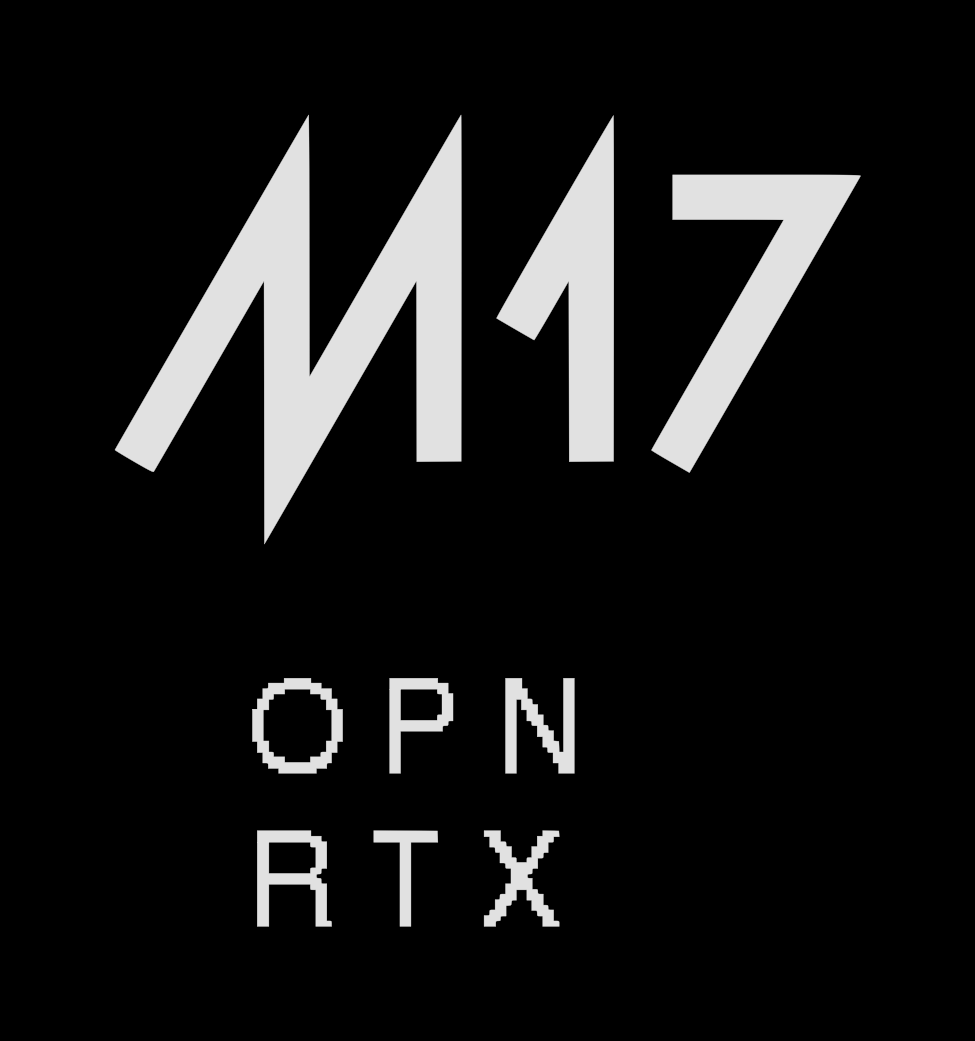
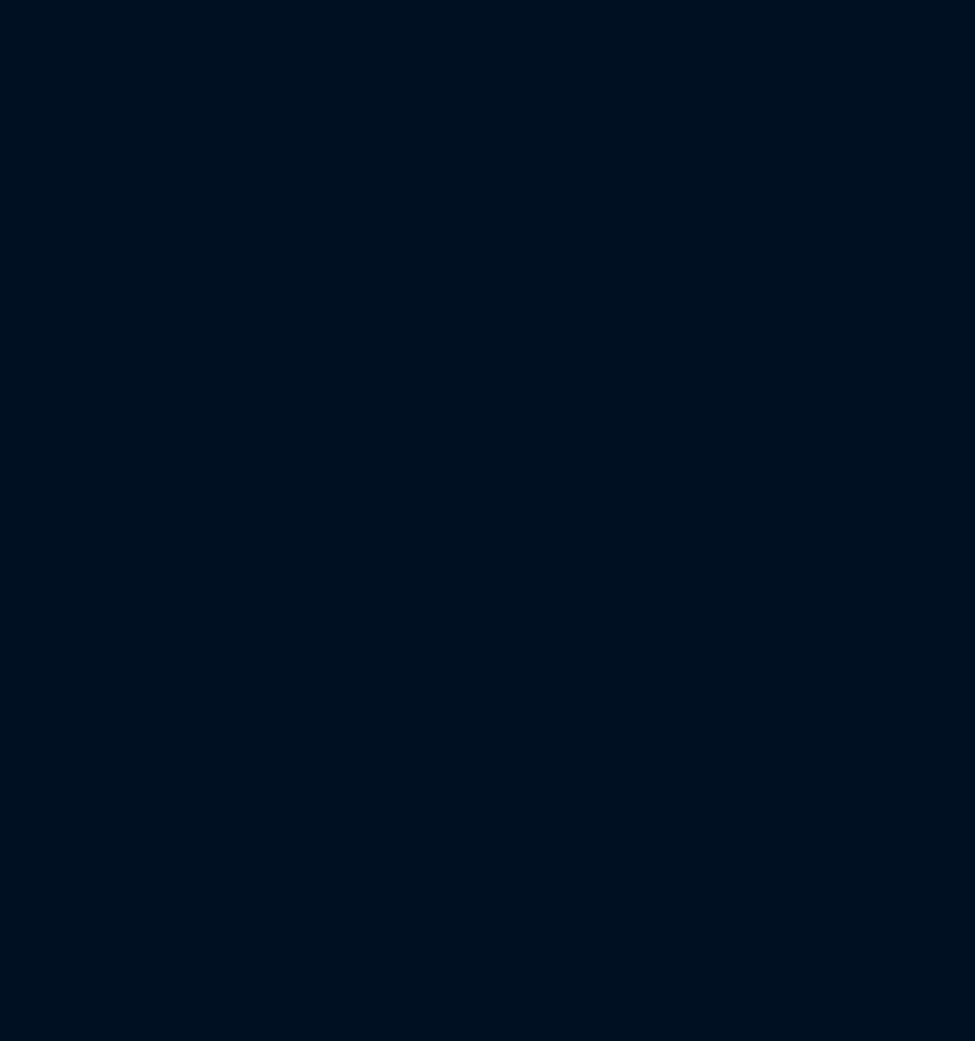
drawing: [114, 114, 861, 545] -> none
drawing: [252, 678, 575, 927] -> none

